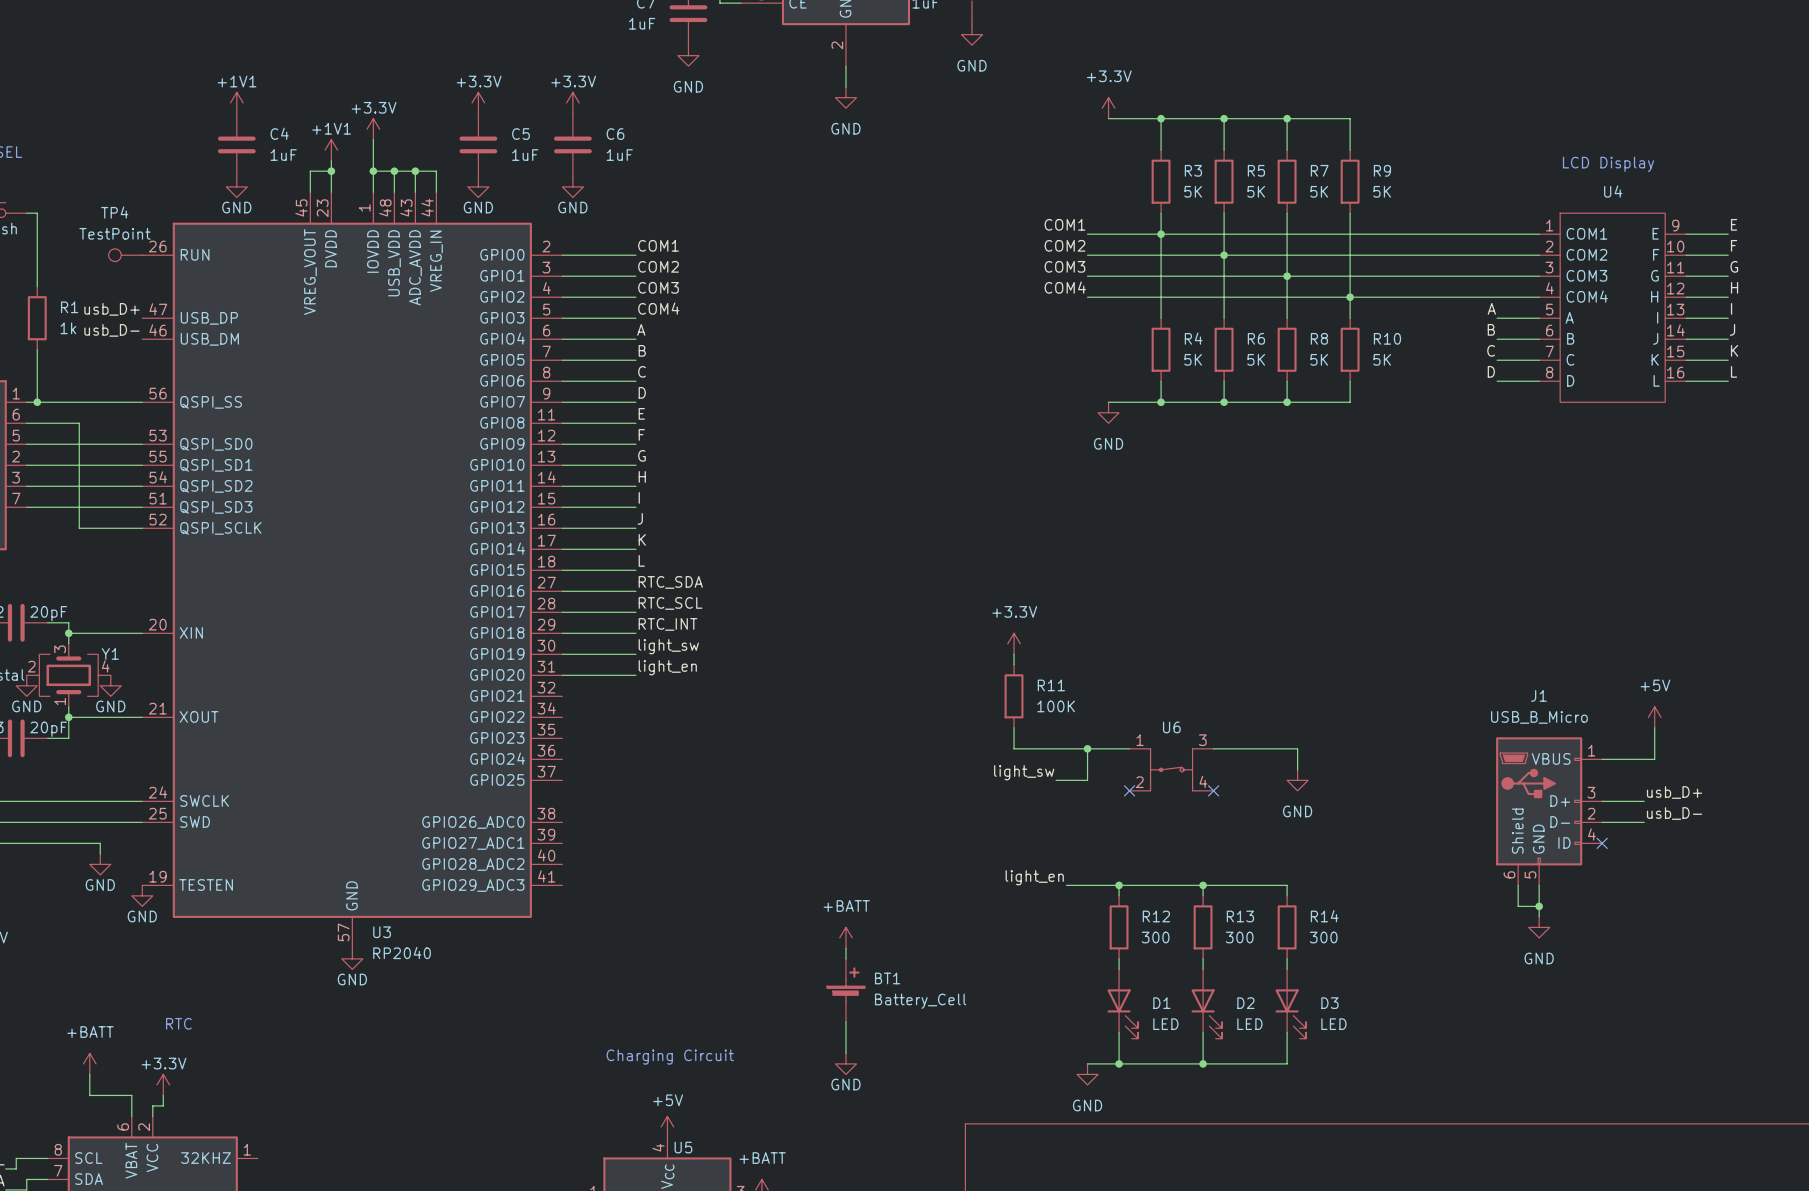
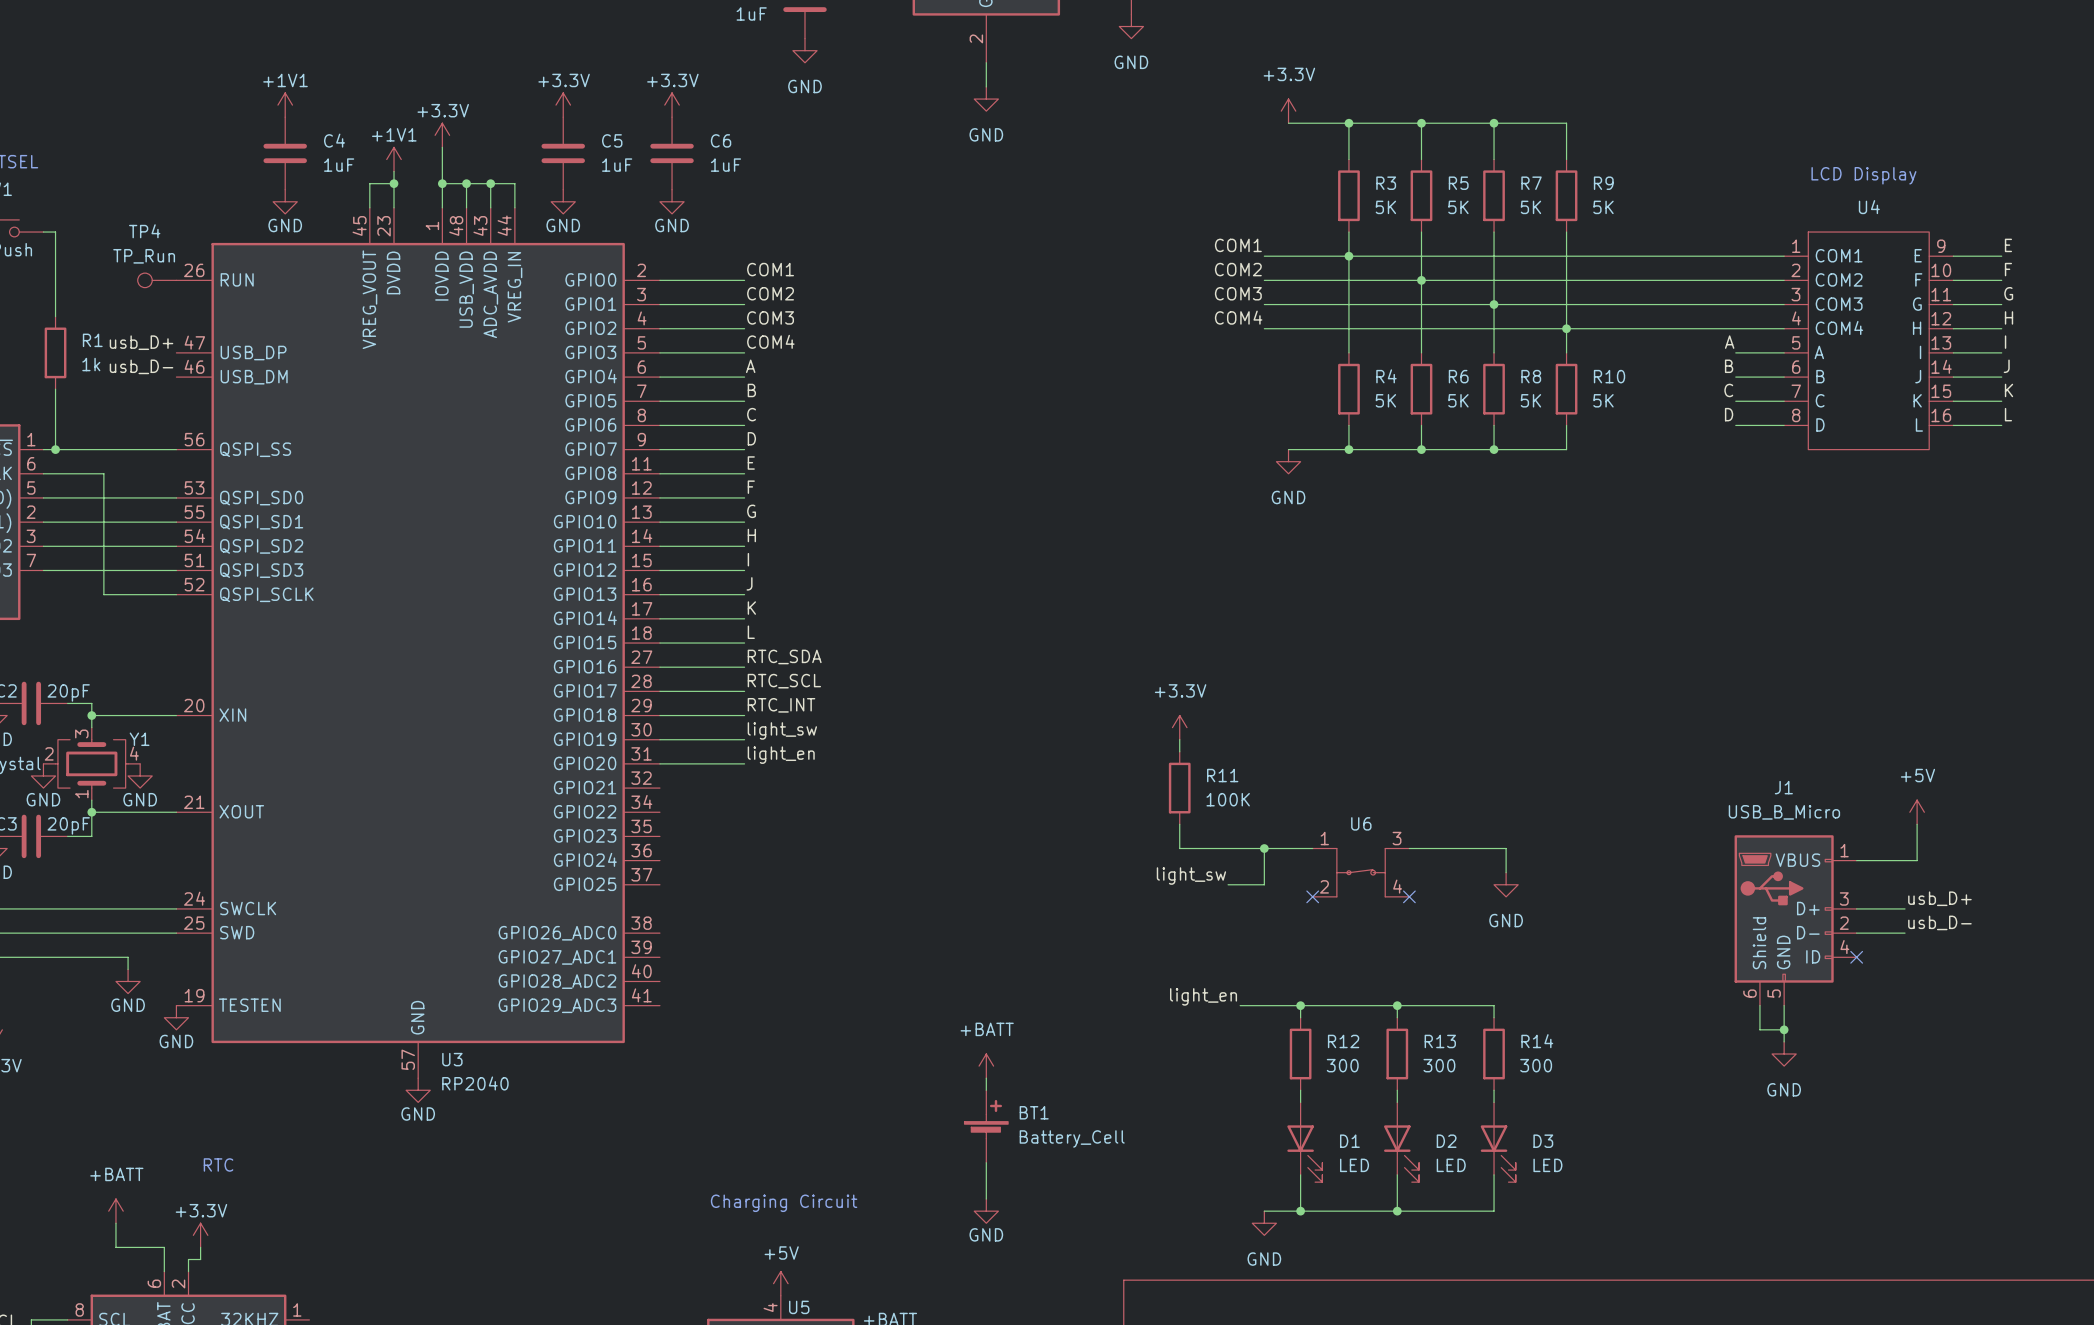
TP4 value: TestPoint (114, 233) -> TP_Run (144, 256)

